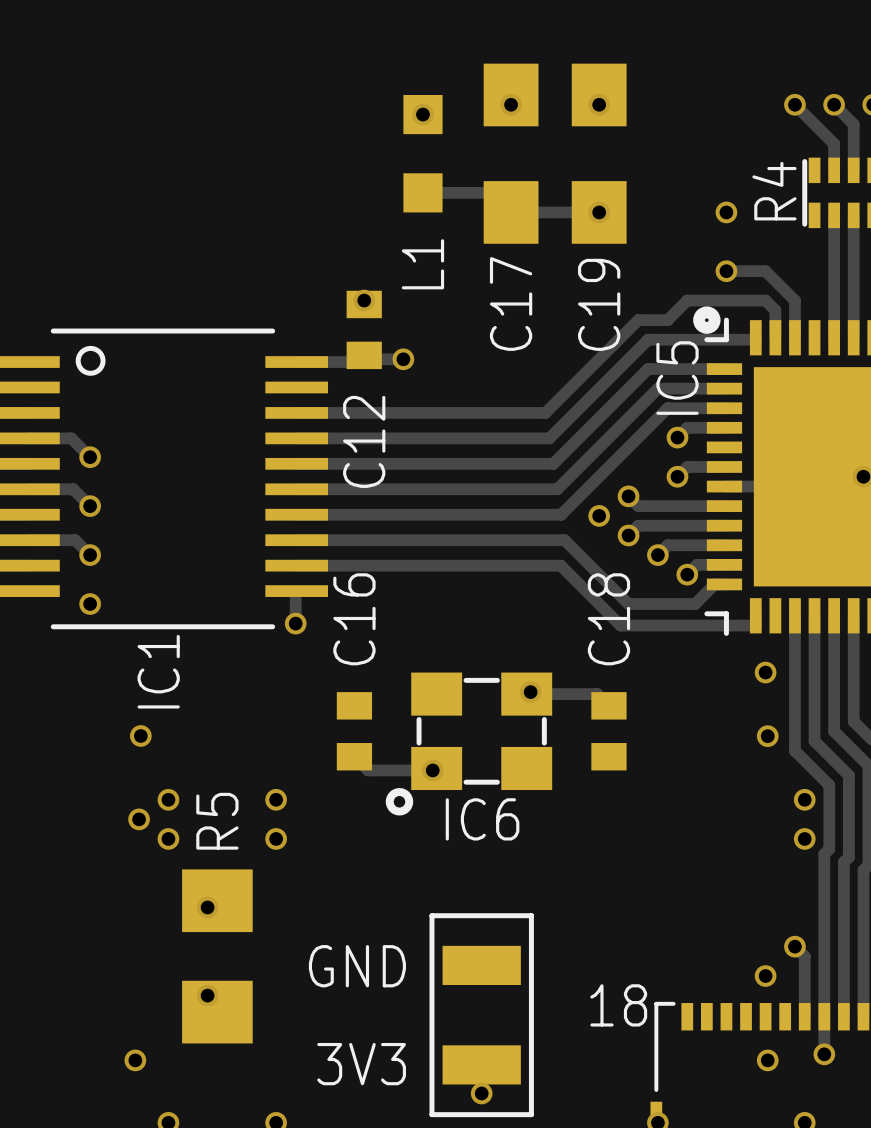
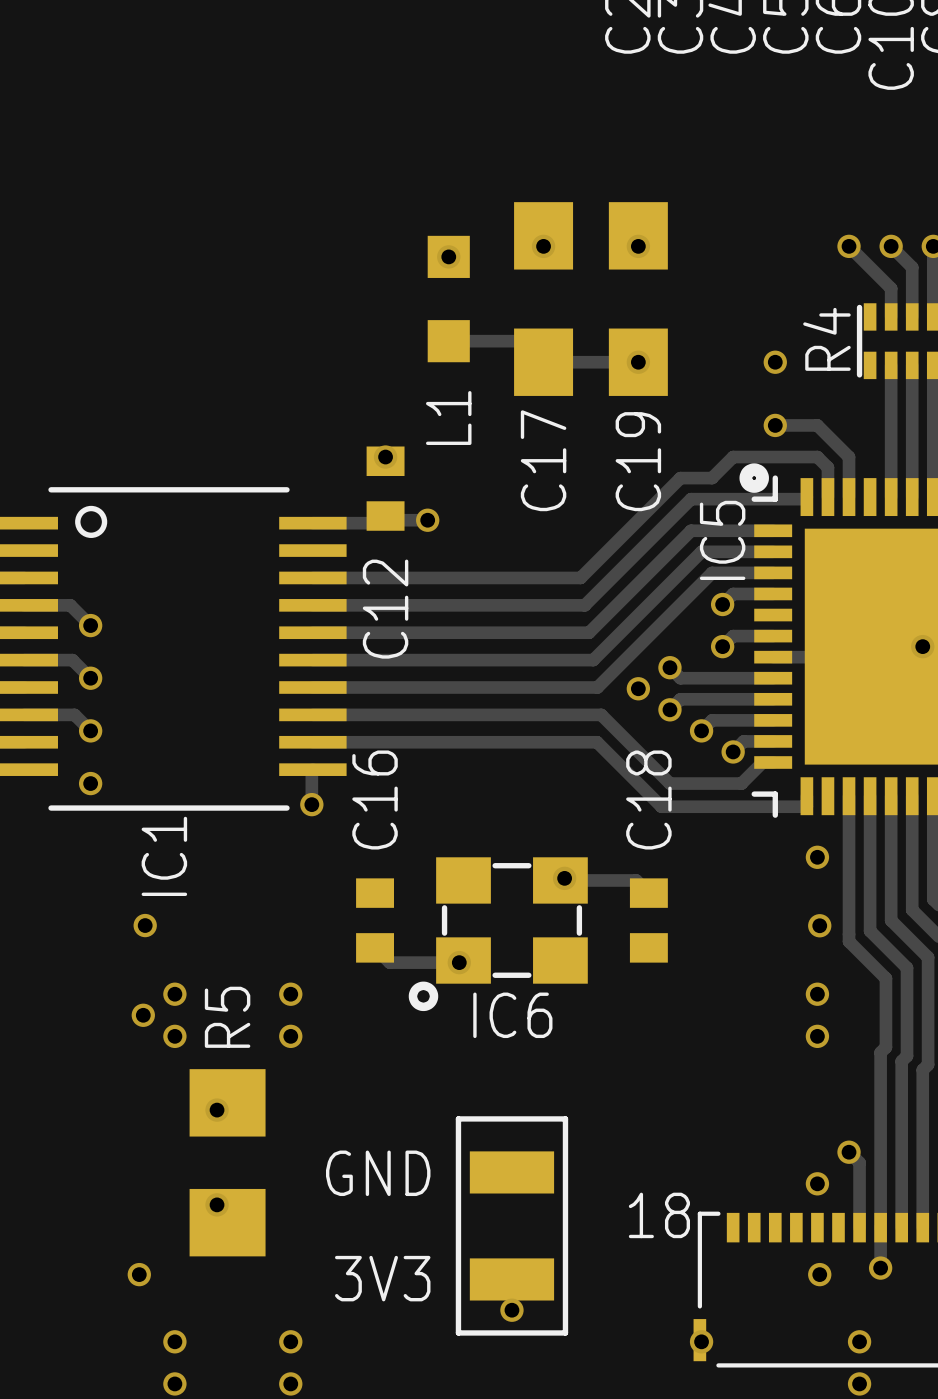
via: none -> (817, 994)
via: (804, 799) -> none
via: none -> (817, 1036)
via: (804, 838) -> none

